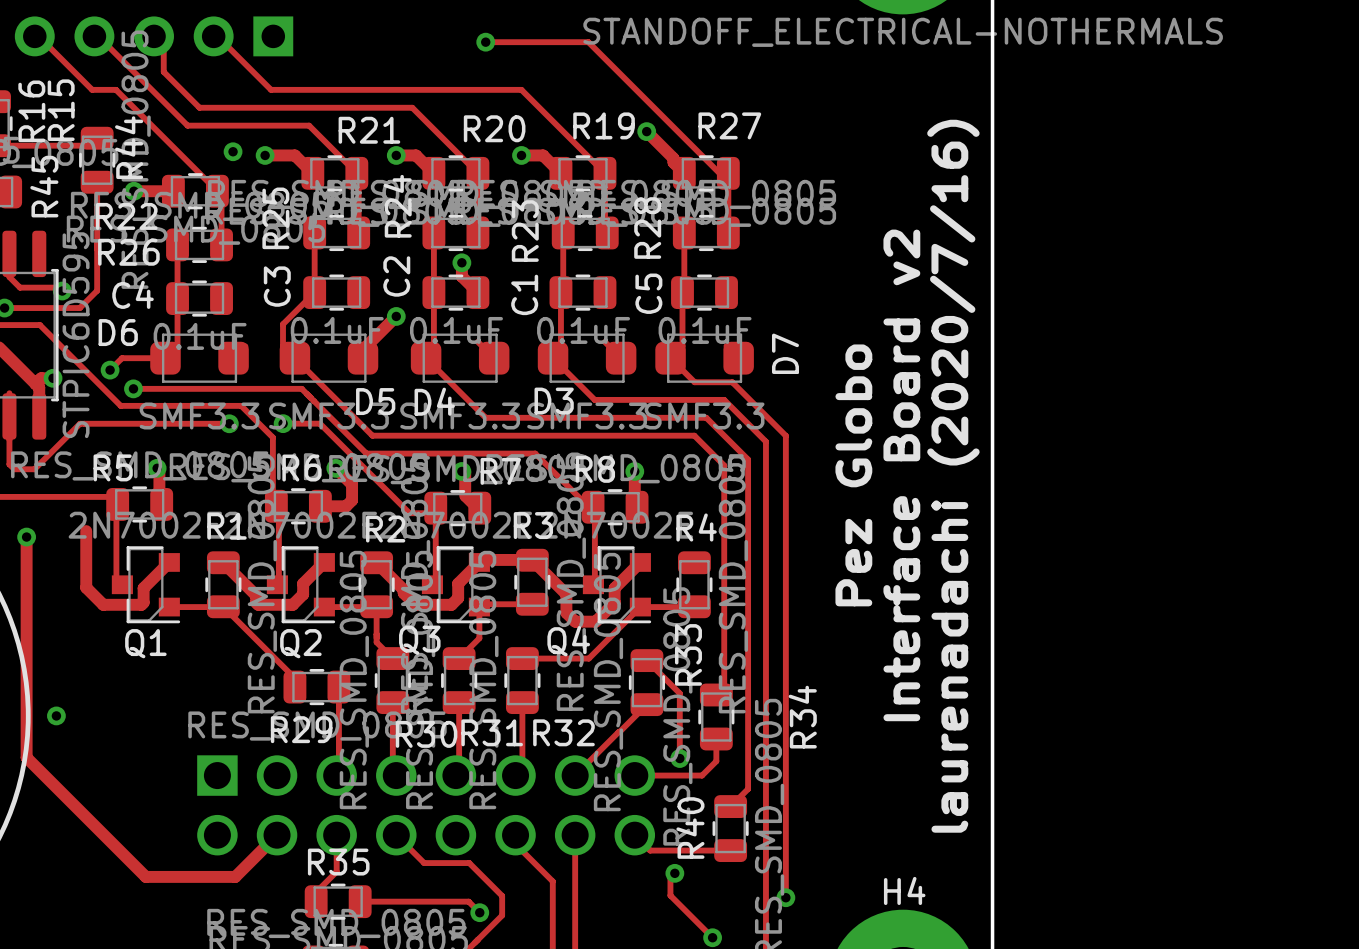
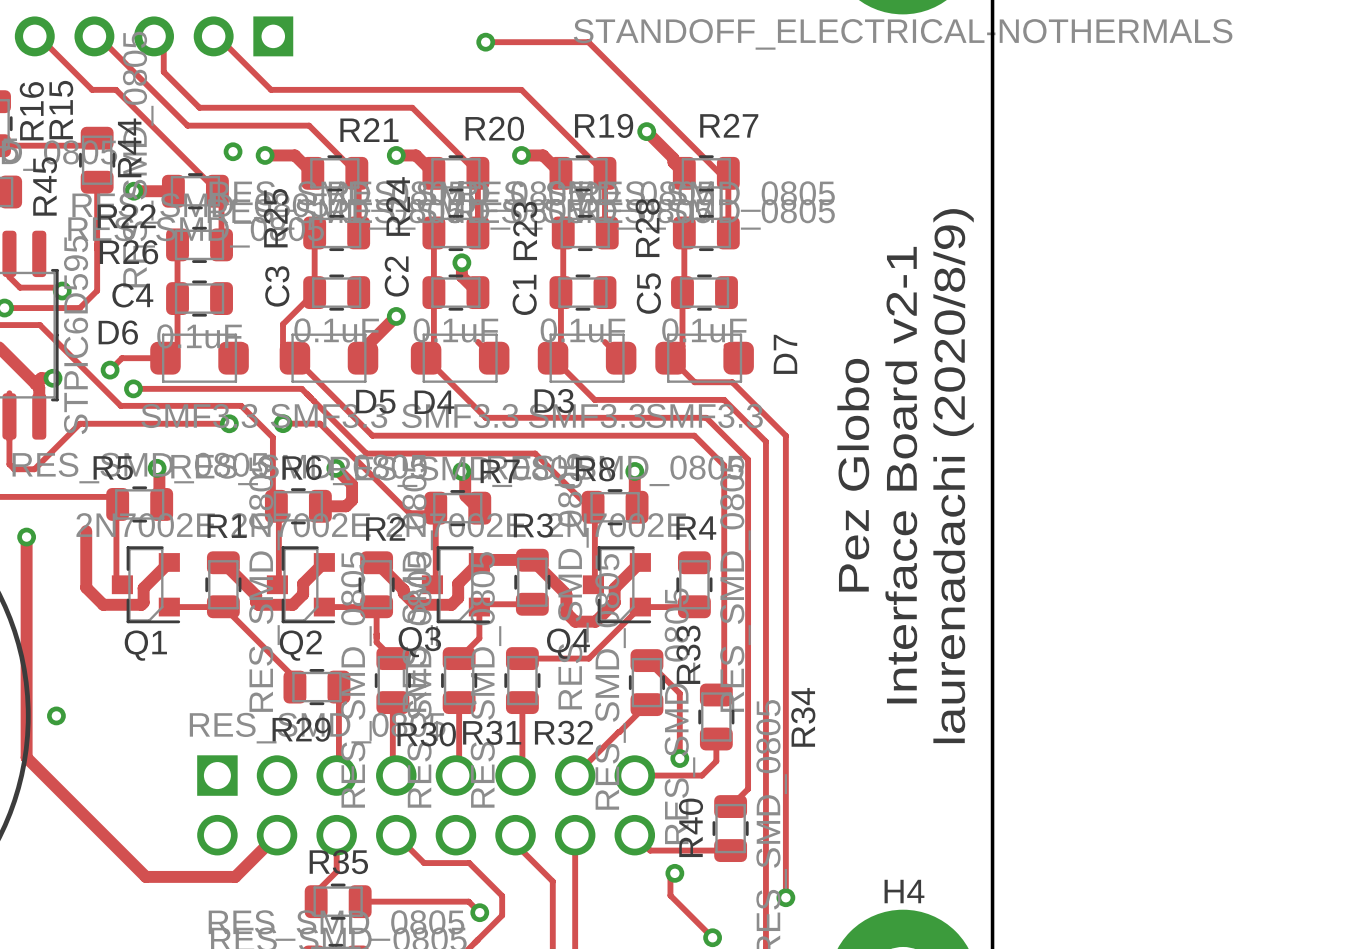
text: Interface Board v2 (901, 475) -> Interface Board v2-1 (901, 475)
text: laurenadachi (2020/7/16) (953, 476) -> laurenadachi (2020/8/9) (953, 476)

